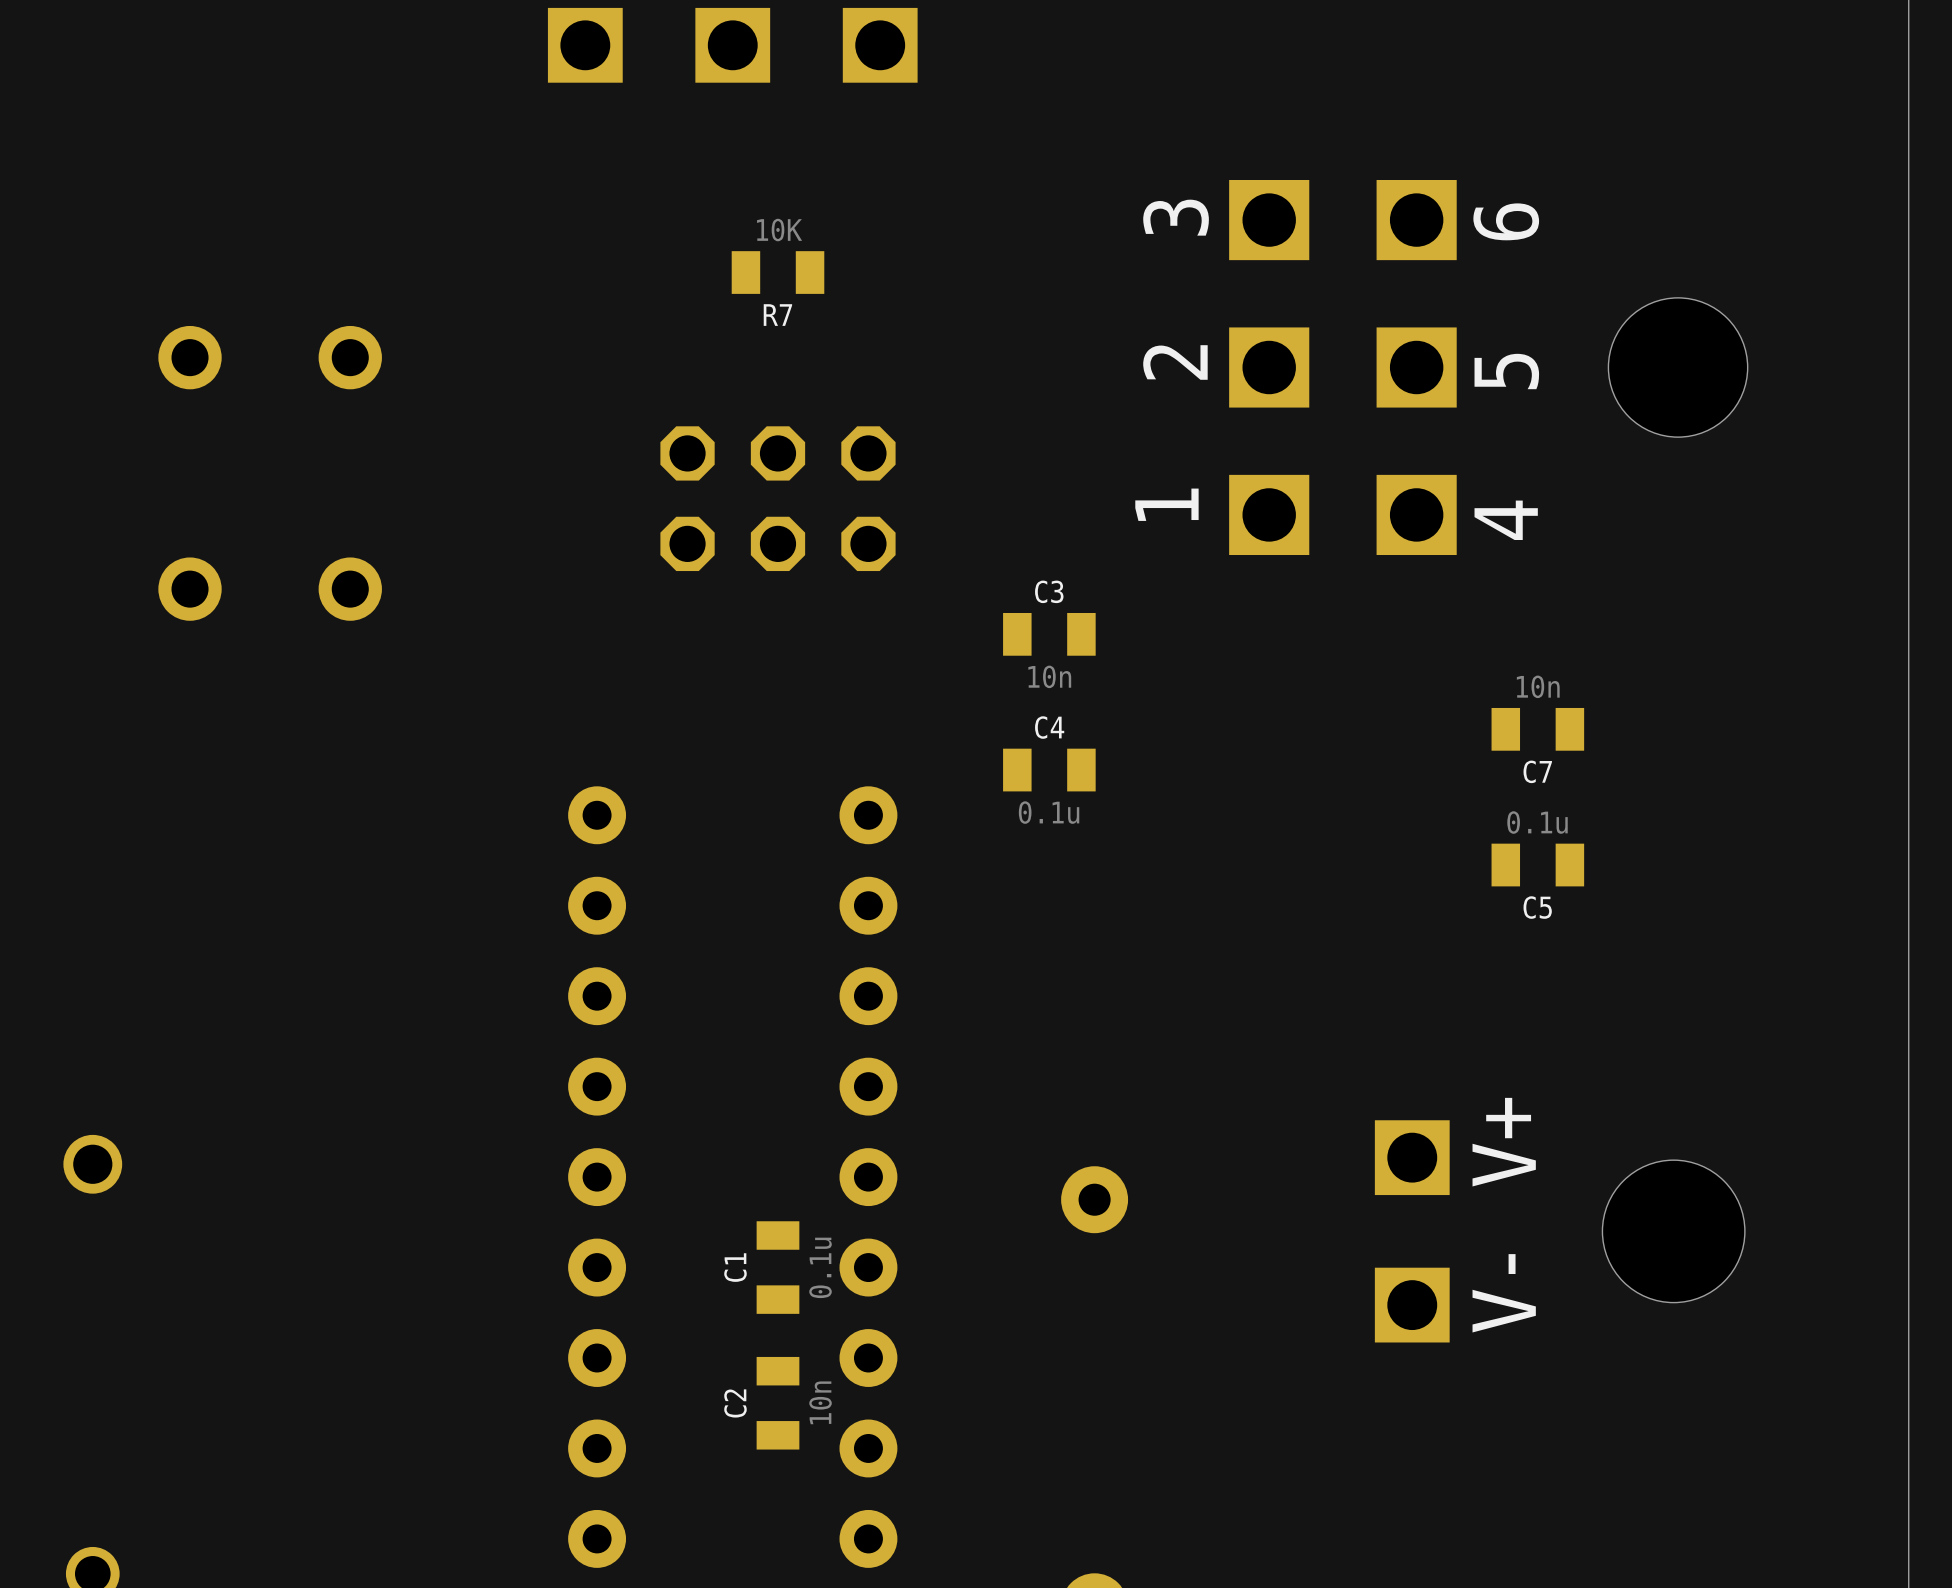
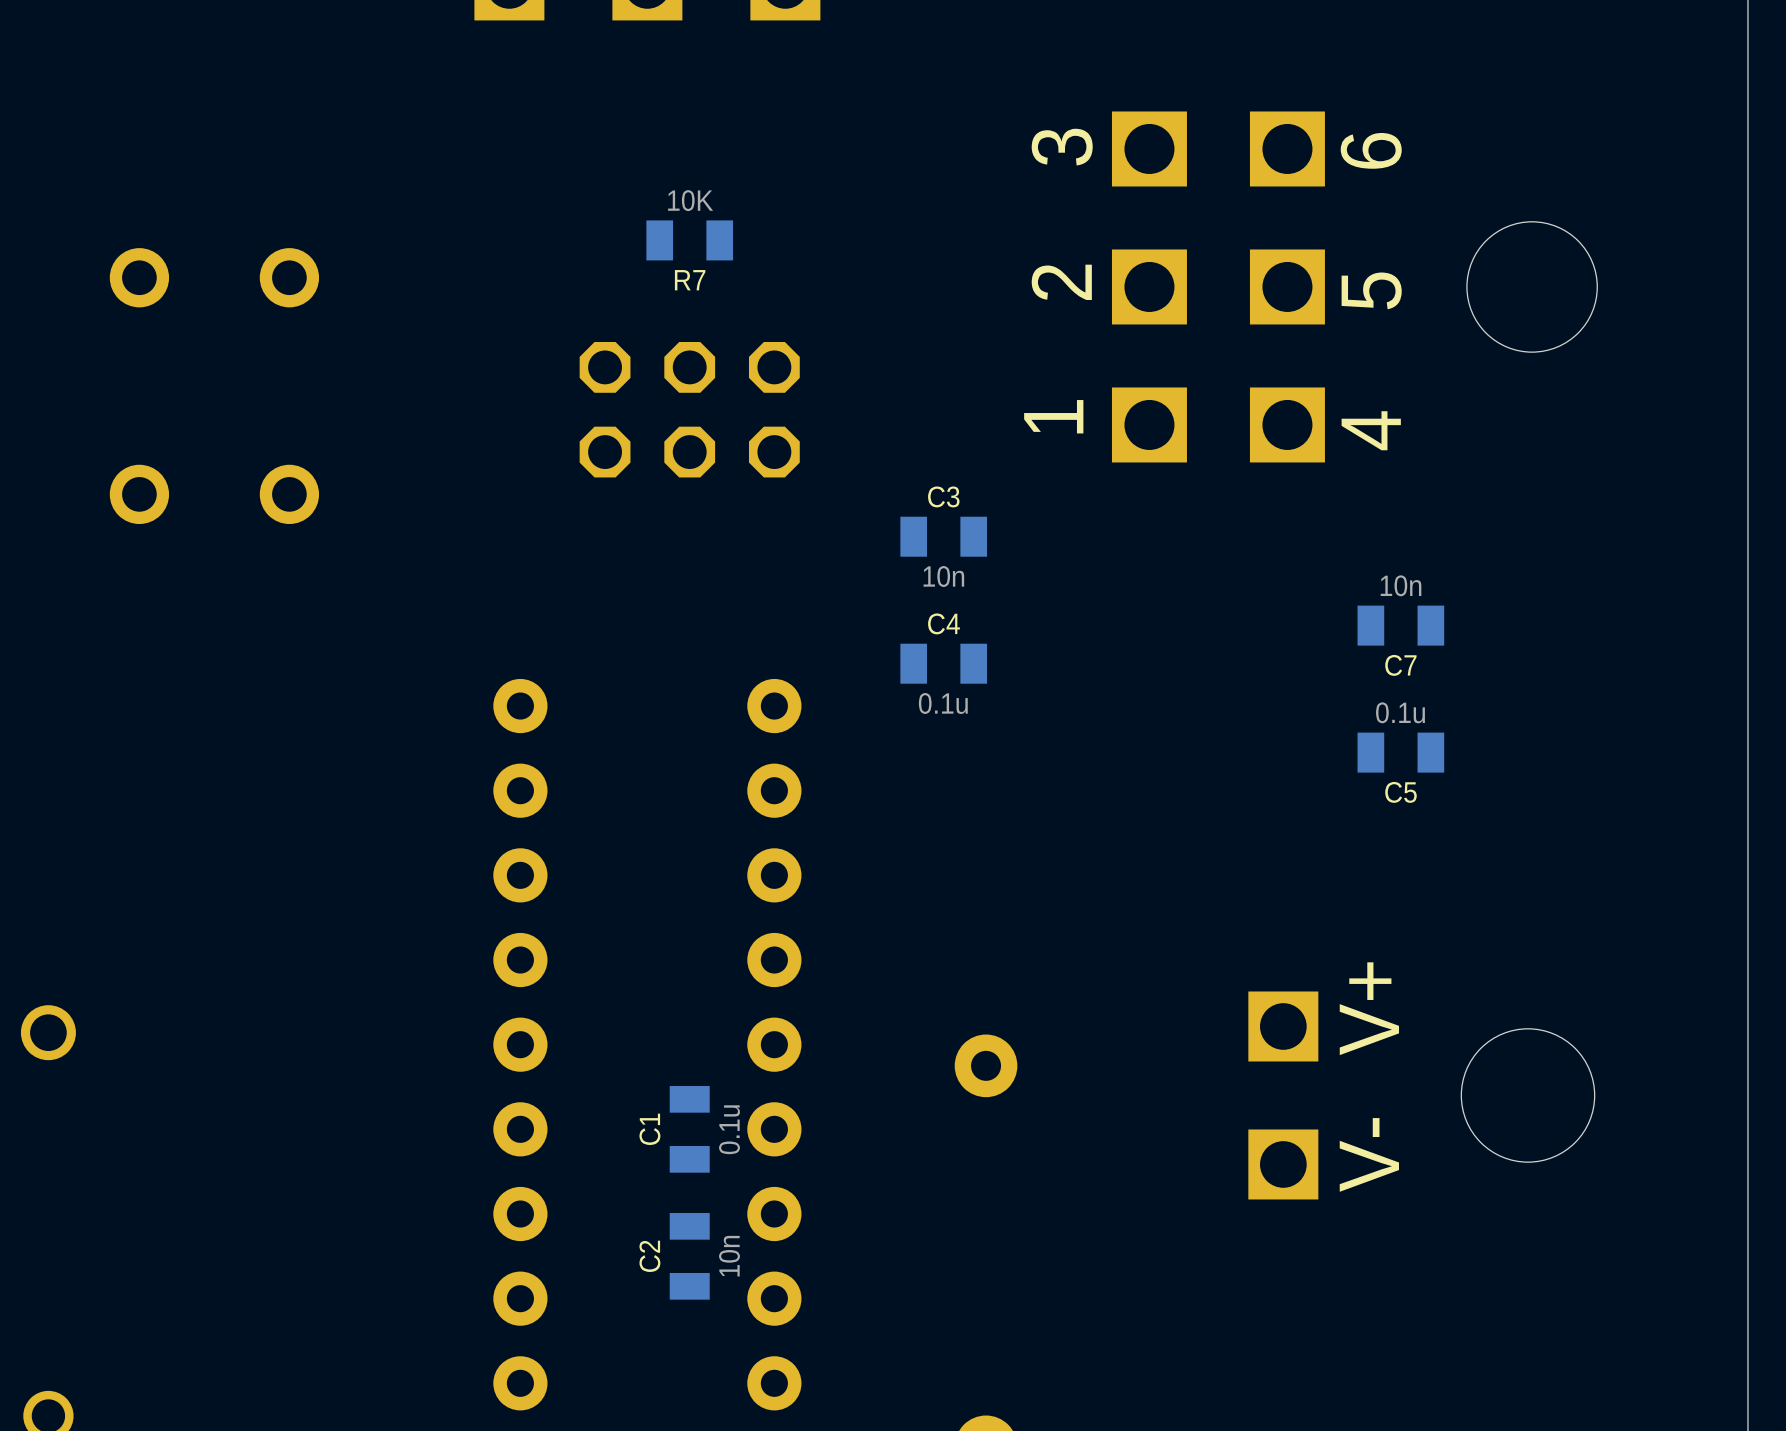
R7 position: (777, 272) -> (689, 240)

